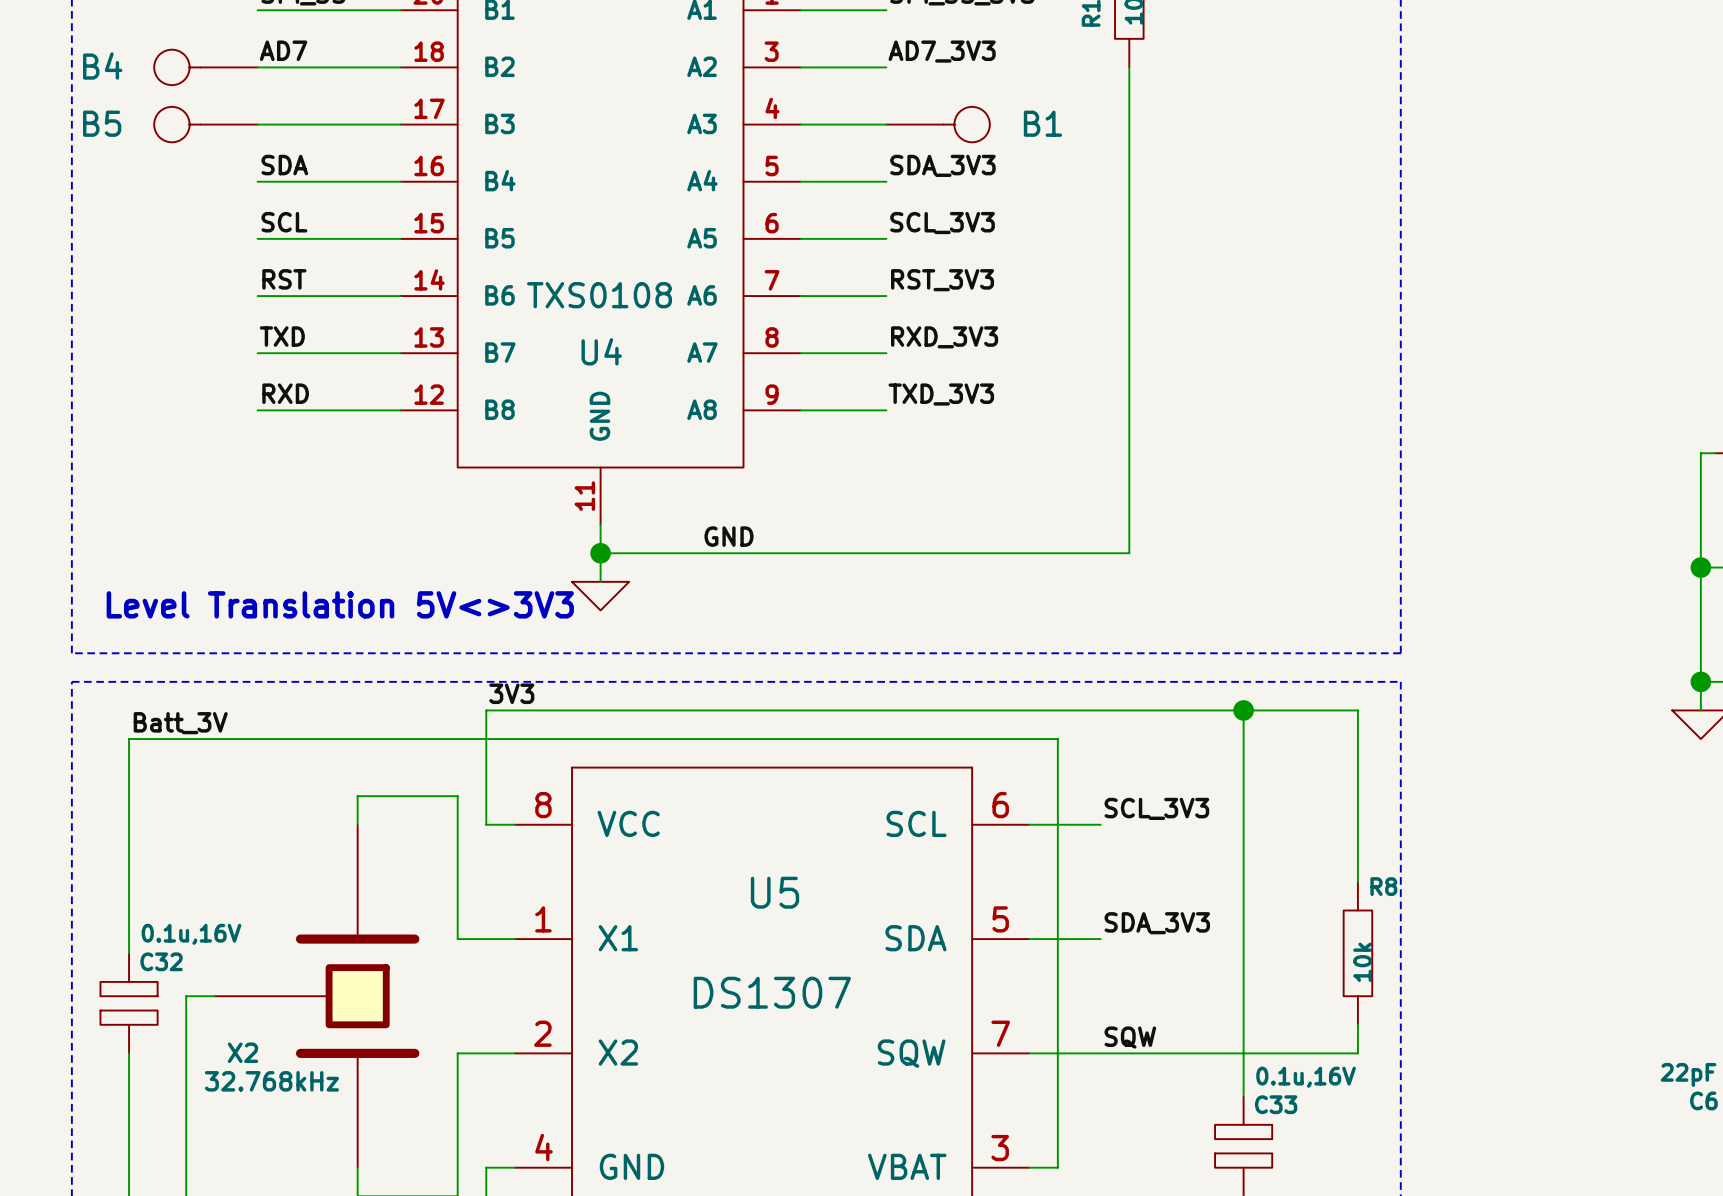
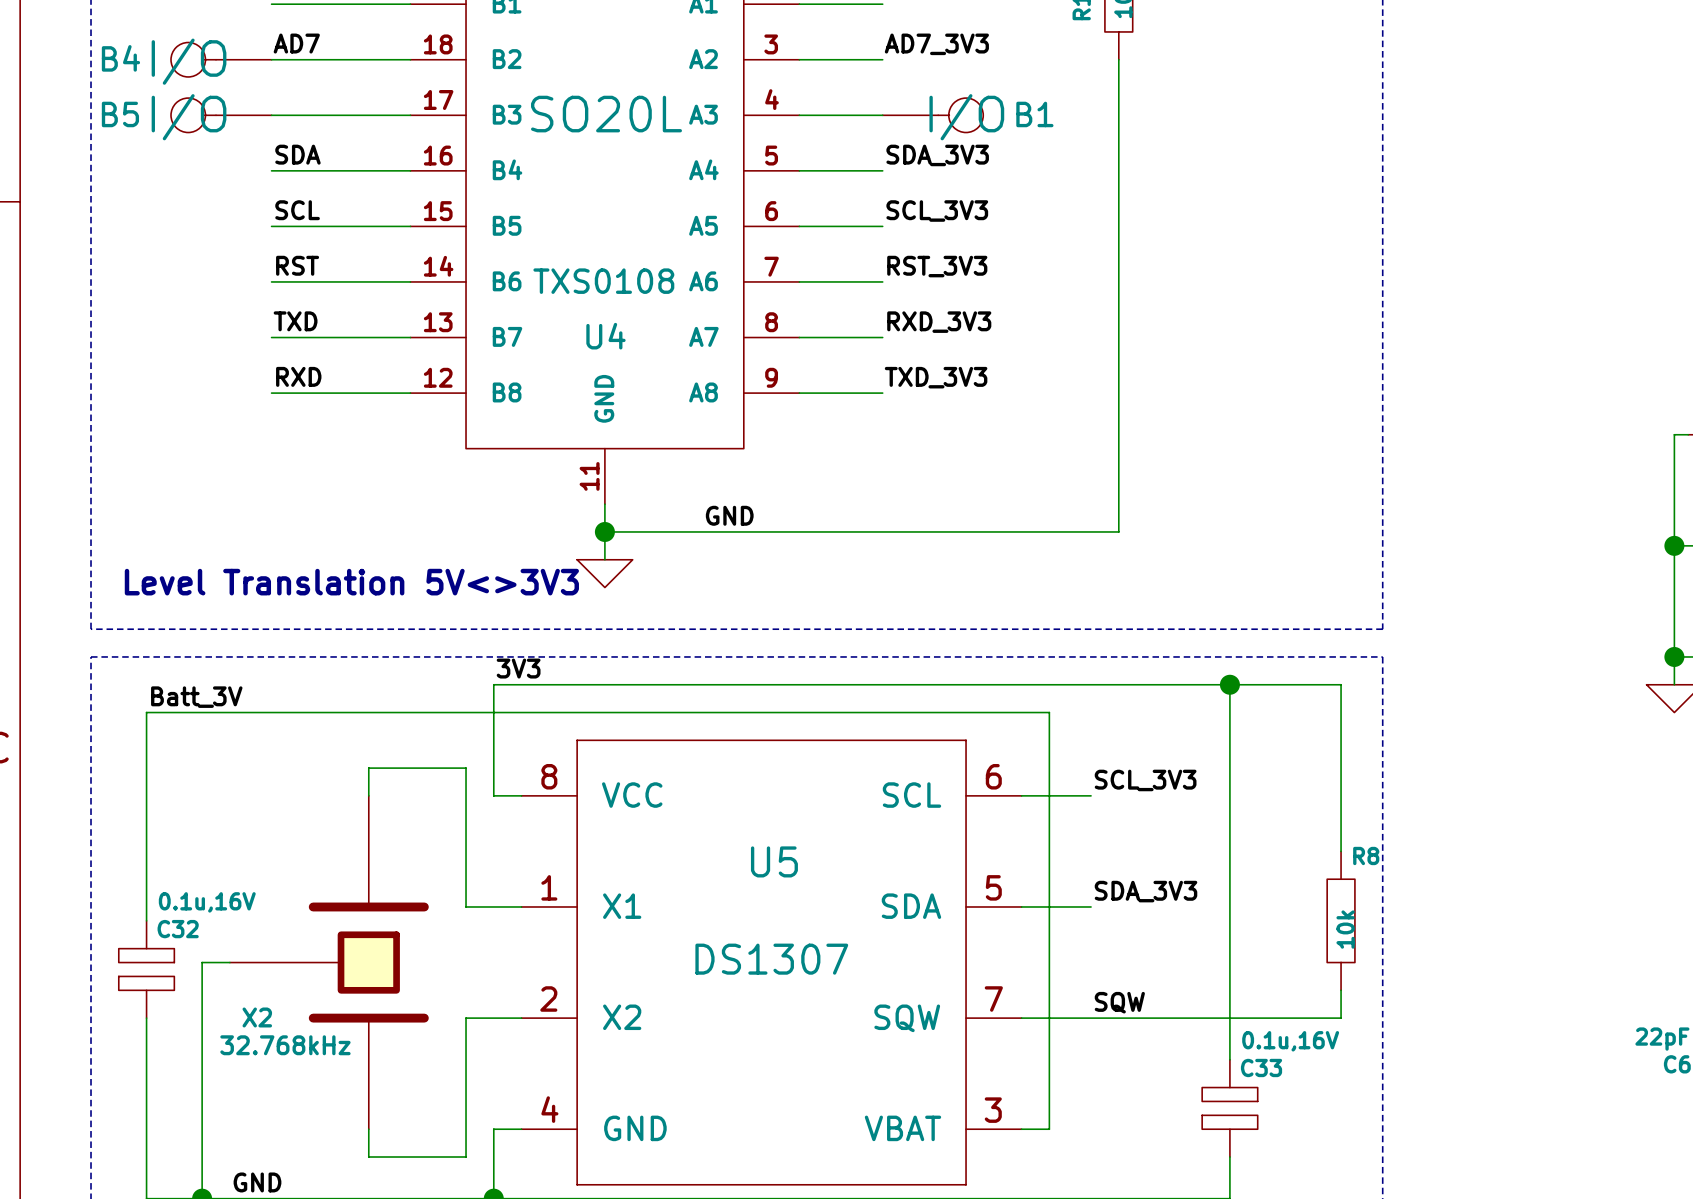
B4 text: none -> I/O (189, 61)
U4 text: none -> SO20L (606, 114)
B5 text: none -> I/O (189, 117)
B1 text: none -> I/O (966, 117)

